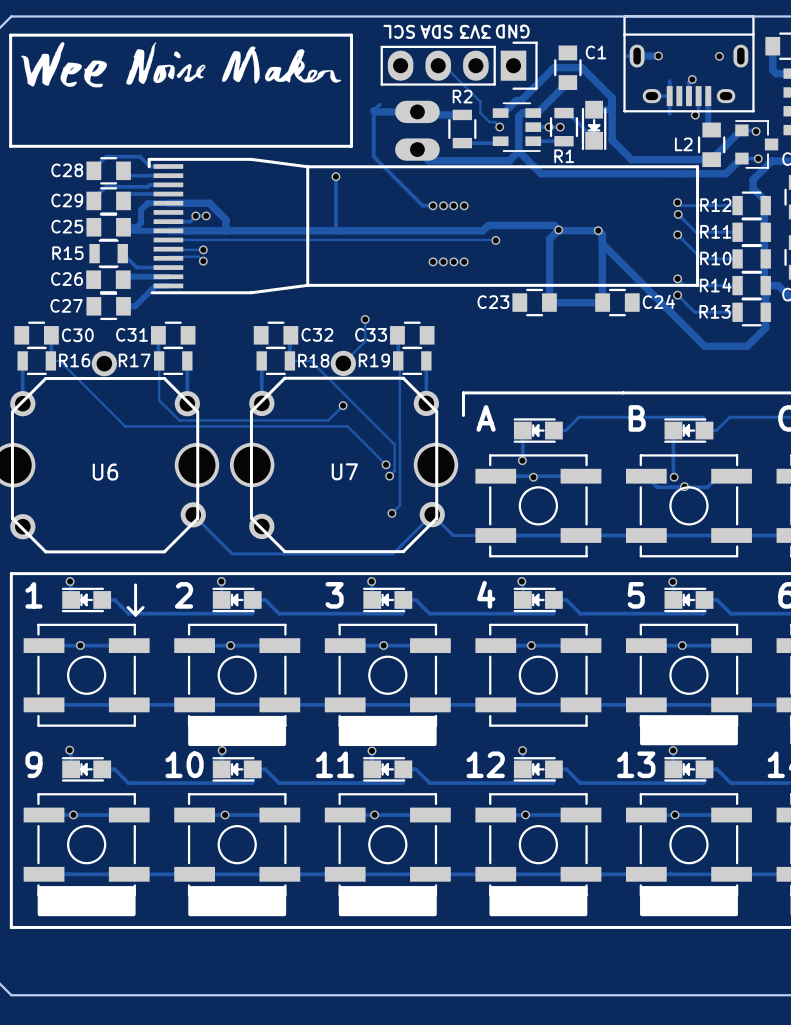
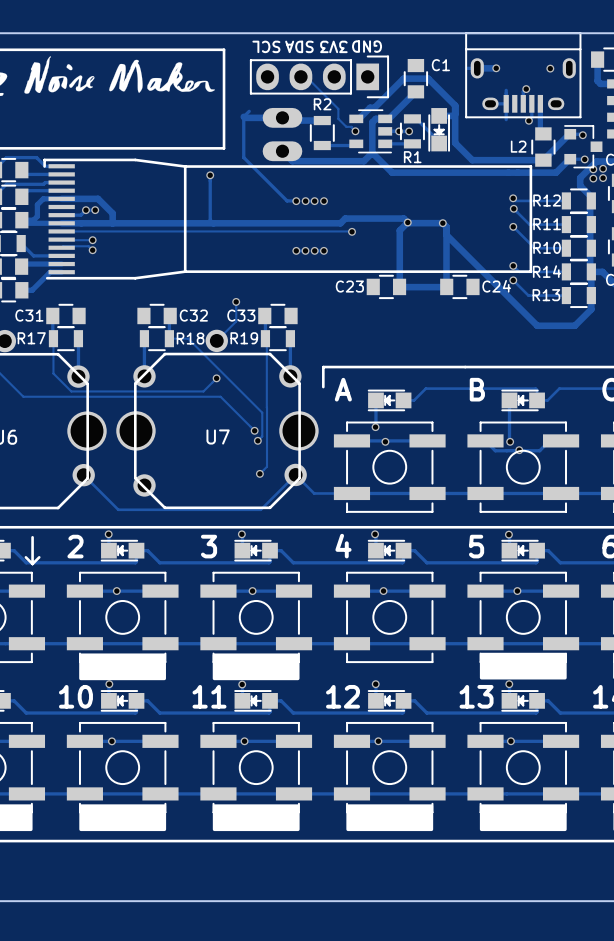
via: none -> (603, 168)
via: none -> (593, 169)
via: none -> (603, 178)
via: none -> (593, 178)

